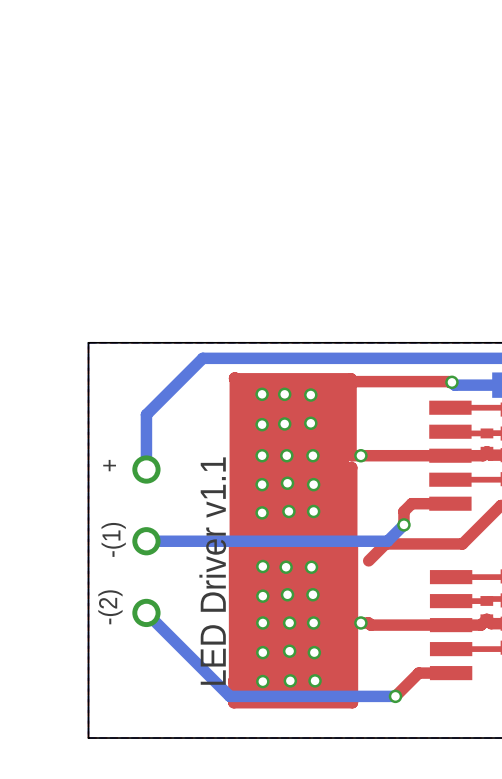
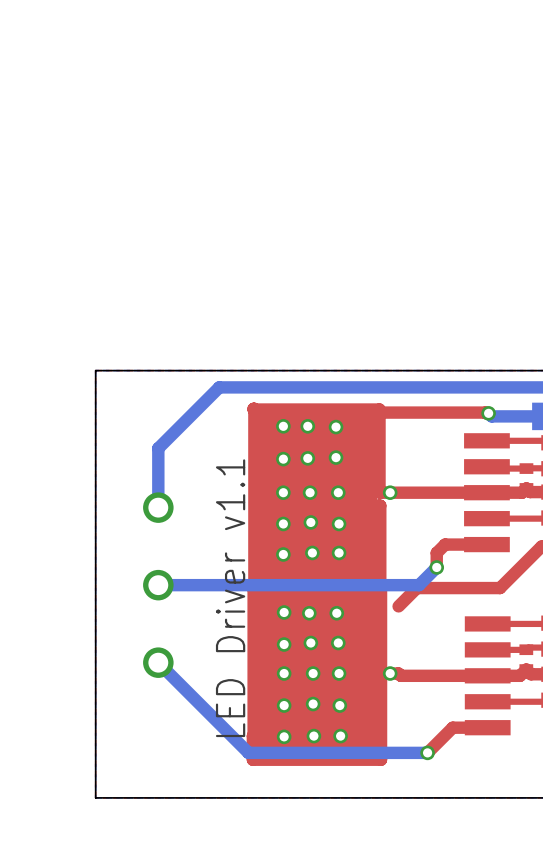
text: + (109, 465) -> none
text: -(1) (113, 539) -> none
text: -(2) (110, 607) -> none

